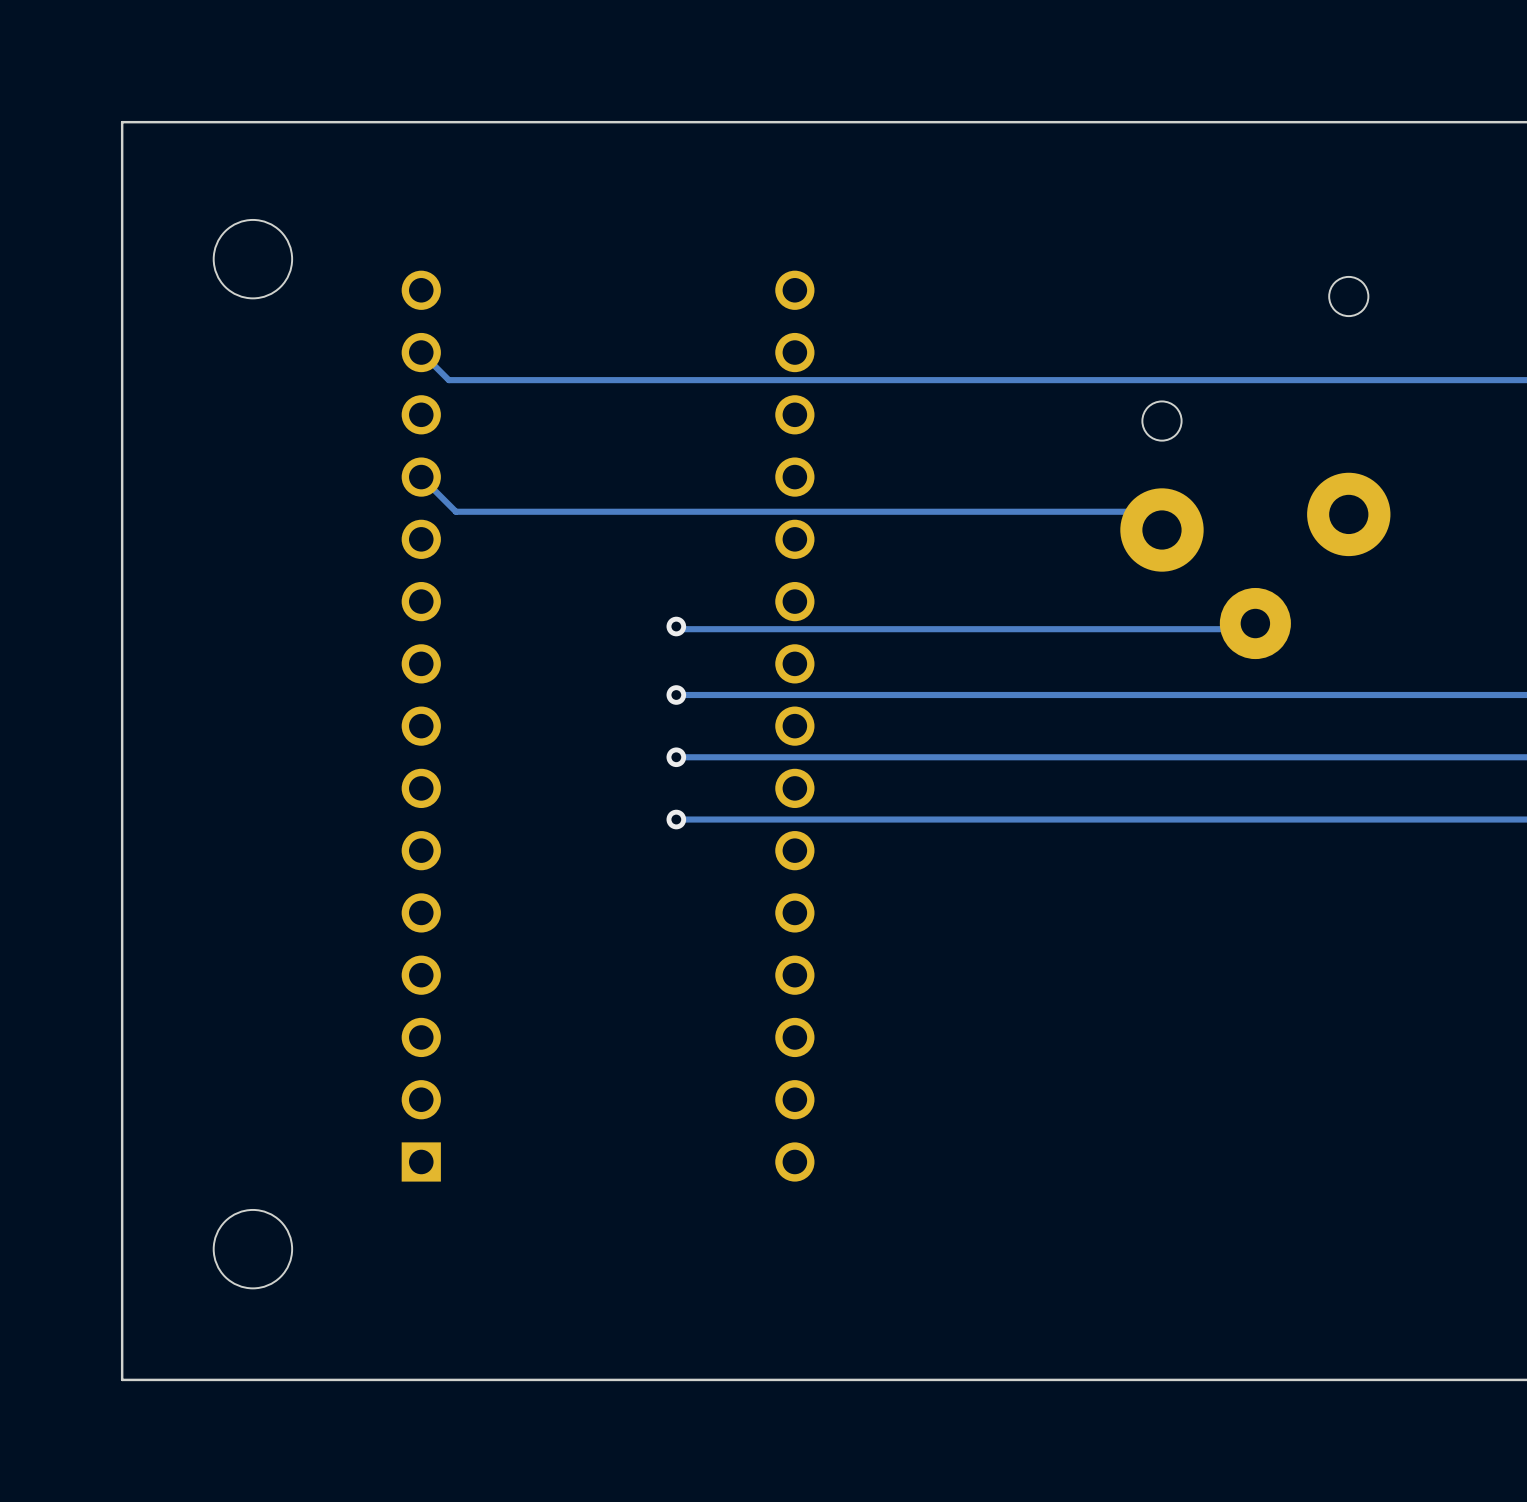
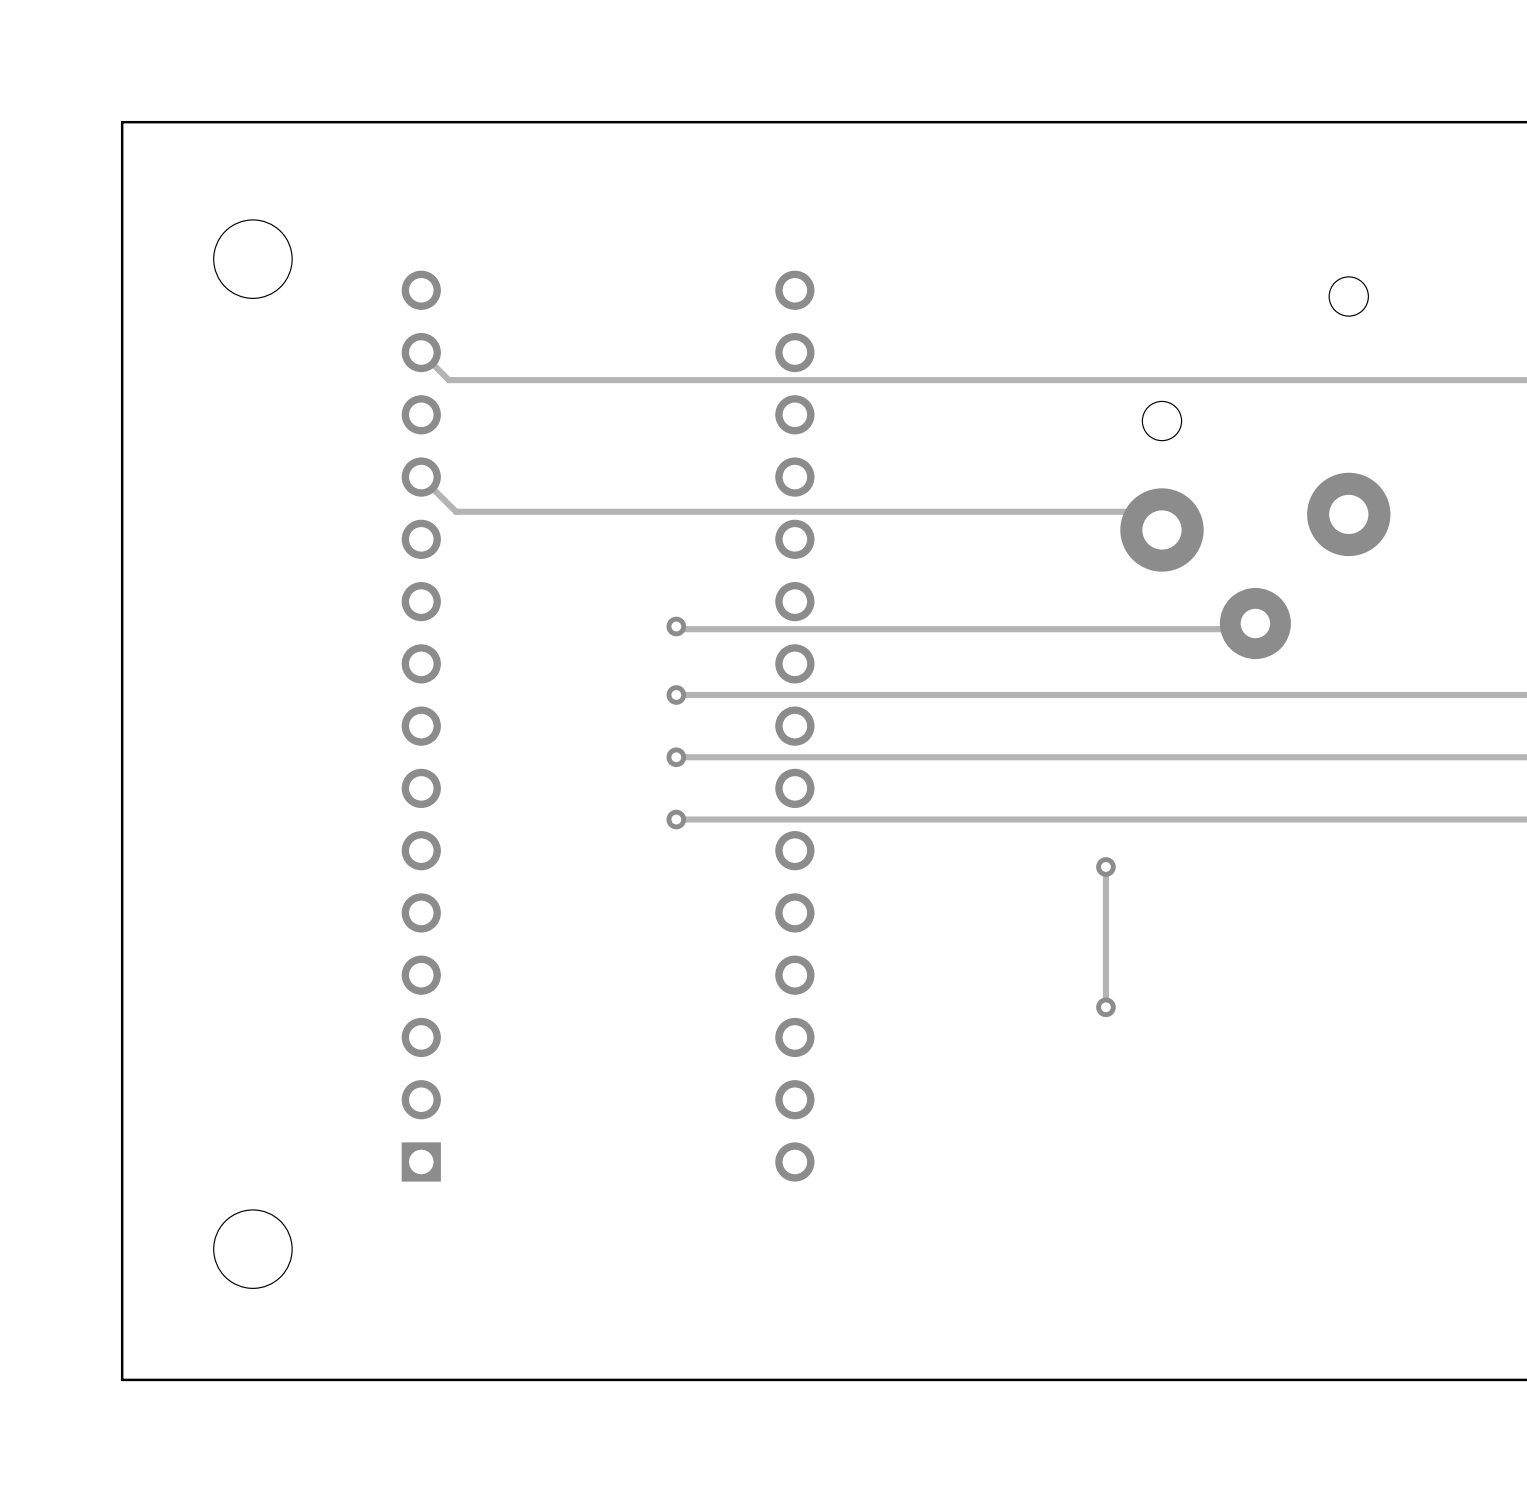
track: none -> (1105, 866) (1105, 1007)
via: none -> (1105, 866)
via: none -> (1105, 1007)

